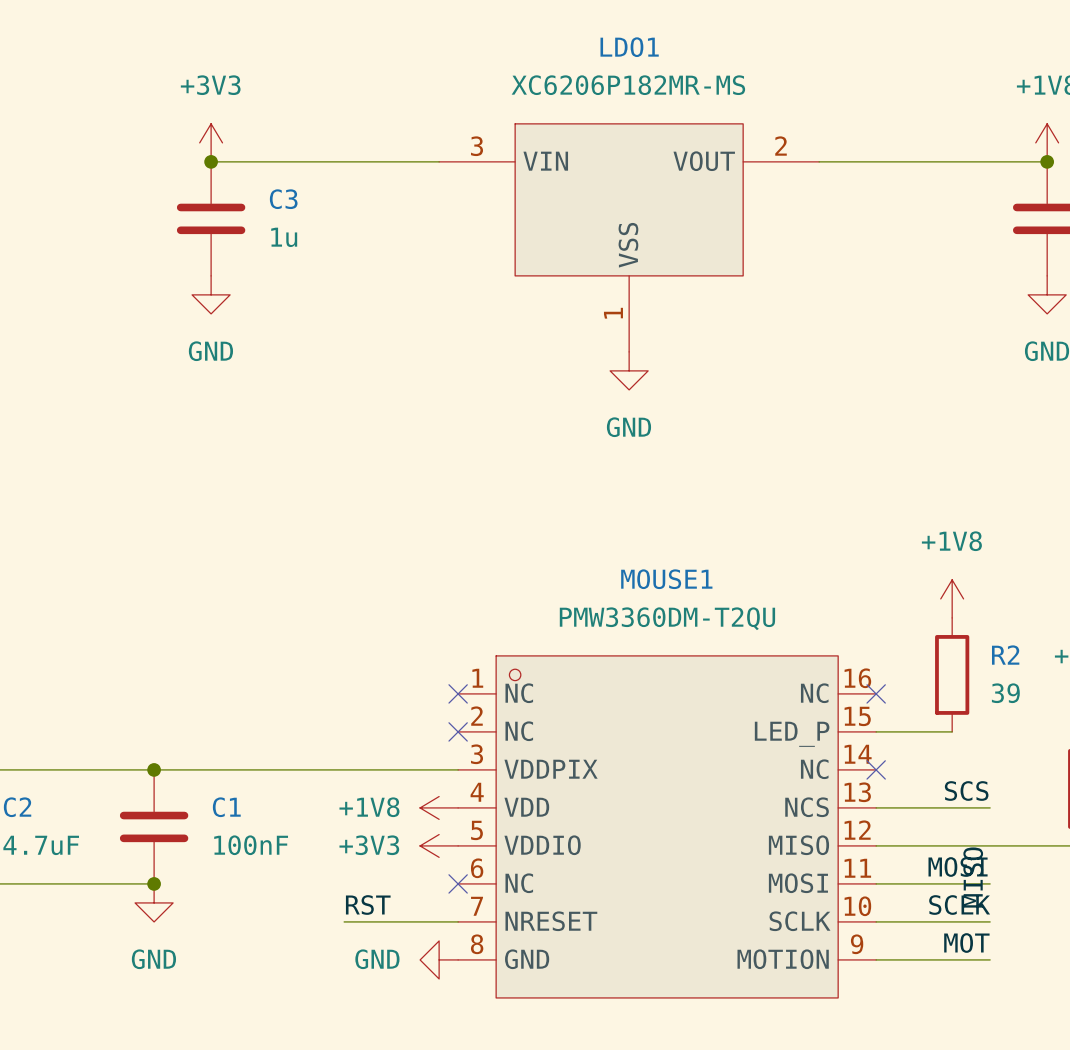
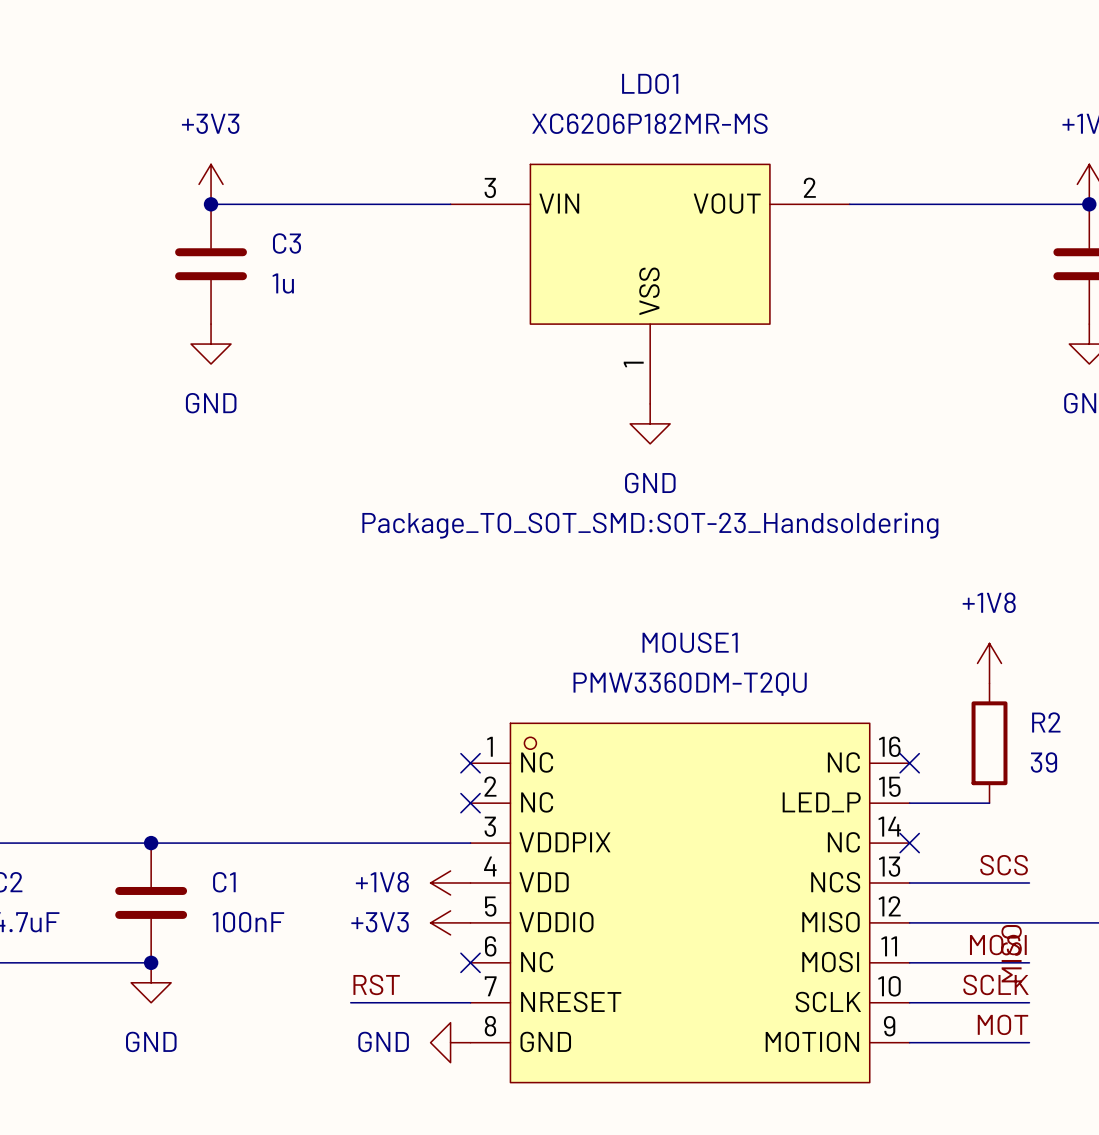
LDO1 text: none -> Package_TO_SOT_SMD:SOT-23_Handsoldering (650, 525)

